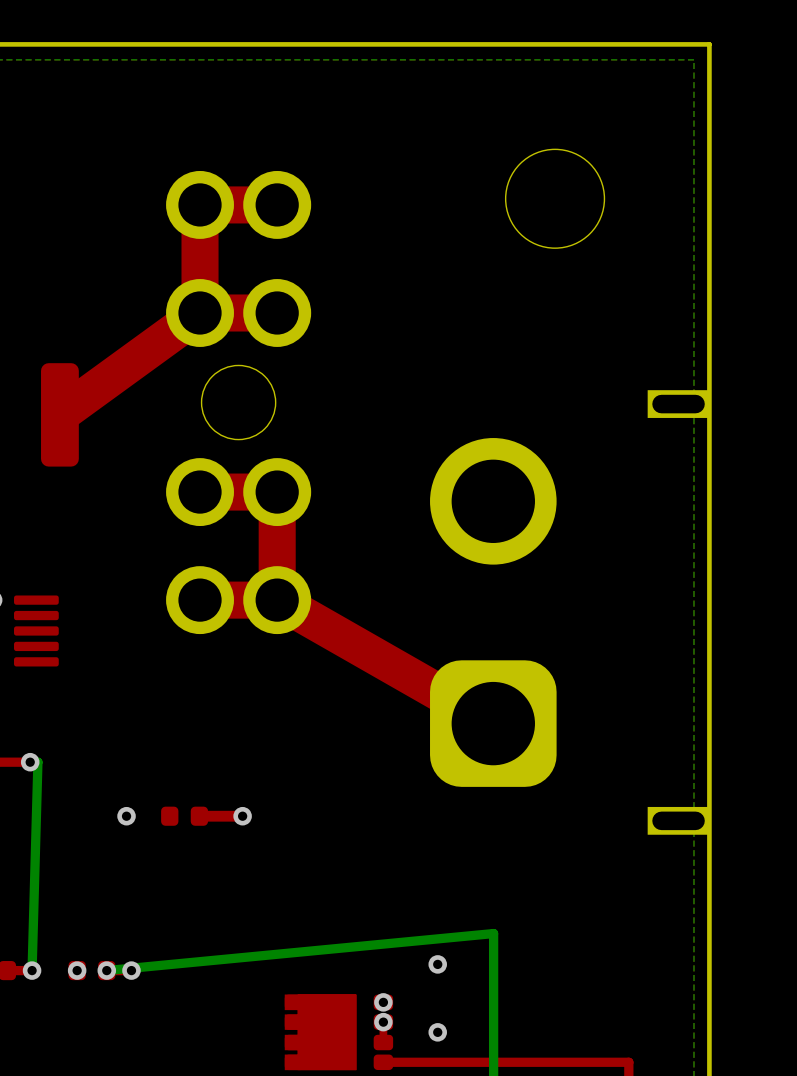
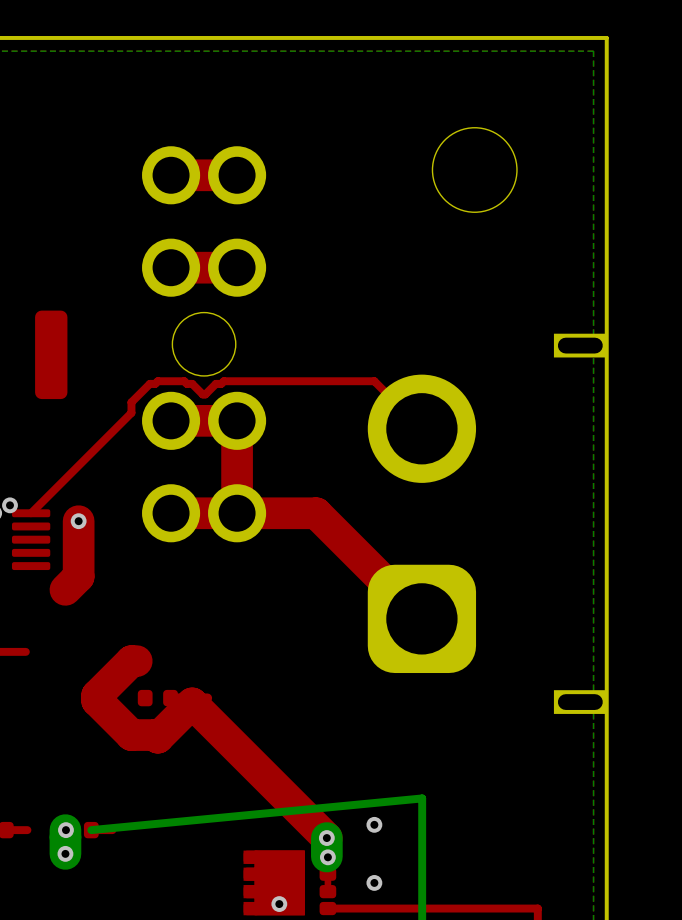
top track: (200, 204) (200, 312) (59, 414) -> none
top track: none -> (421, 428) (374, 381) (223, 381) (221, 383) (215, 383) (205, 394) (202, 394) (192, 383) (186, 383) (184, 381) (157, 381) (155, 383) (149, 383) (131, 402) (131, 412) (31, 513)
via: none -> (10, 505)
top track: (277, 600) (493, 723) -> (237, 513) (316, 513) (421, 618)
top track: none -> (78, 521) (78, 576) (65, 589)
via: none -> (78, 521)
bottom track: (30, 762) (37, 762) (32, 970) -> none
via: (30, 762) -> none
top track: none -> (136, 661) (131, 661) (97, 695) (97, 700) (131, 735) (155, 735) (157, 737) (192, 703) (326, 838)
via: (126, 816) -> none
via: (242, 816) -> none
via: (32, 970) -> none
bottom track: none -> (65, 830) (65, 853)
via: (106, 970) -> none
via: (131, 970) -> none
bottom track: none -> (326, 838) (326, 856)
via: none -> (326, 838)
via: none -> (65, 853)
via: (383, 1022) -> none
via: none -> (279, 904)

